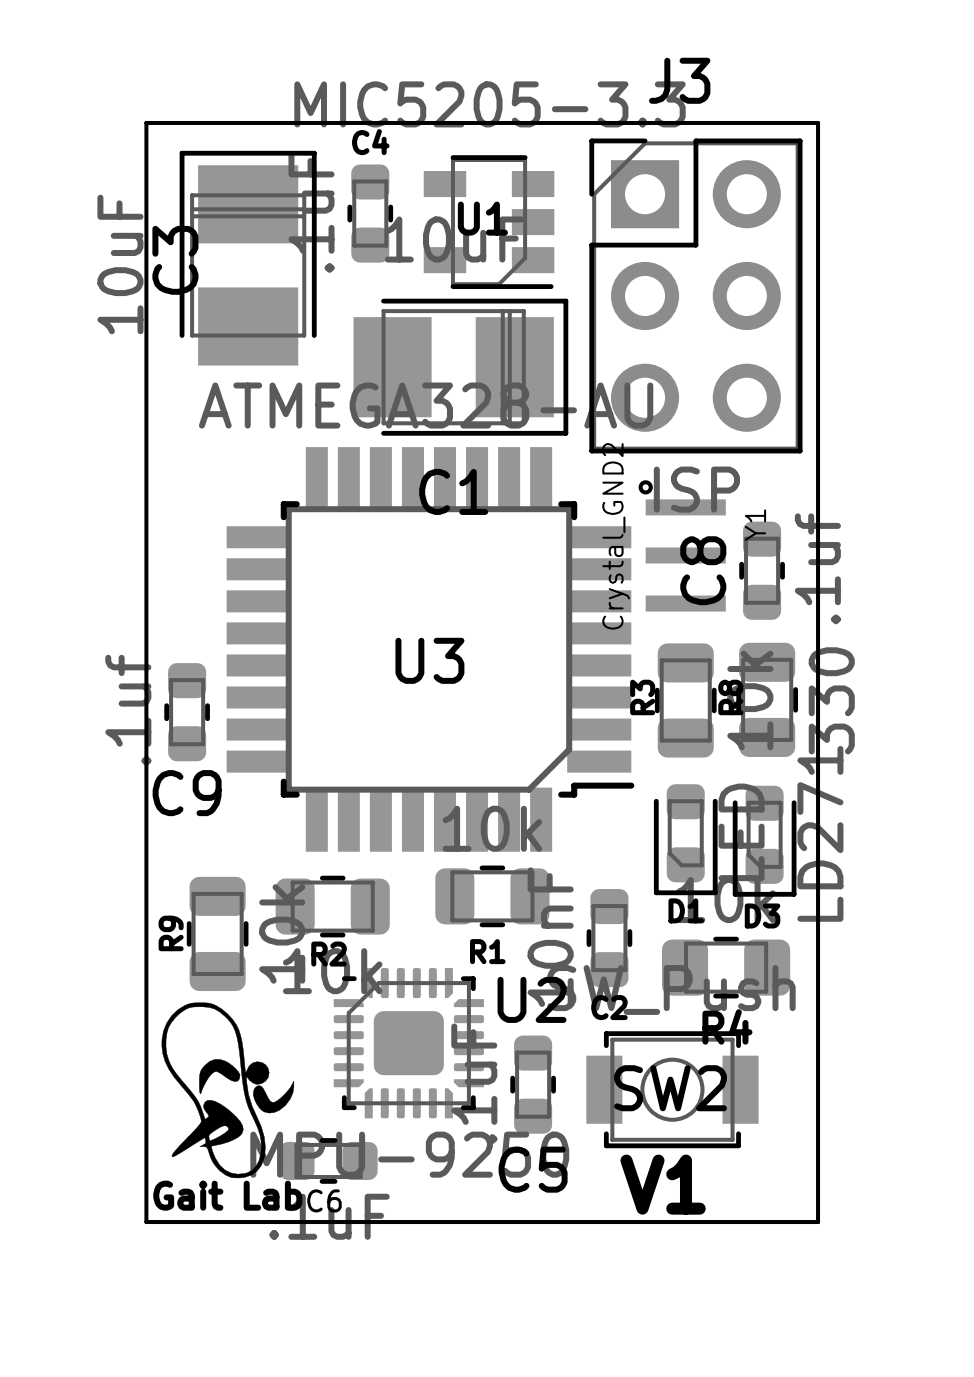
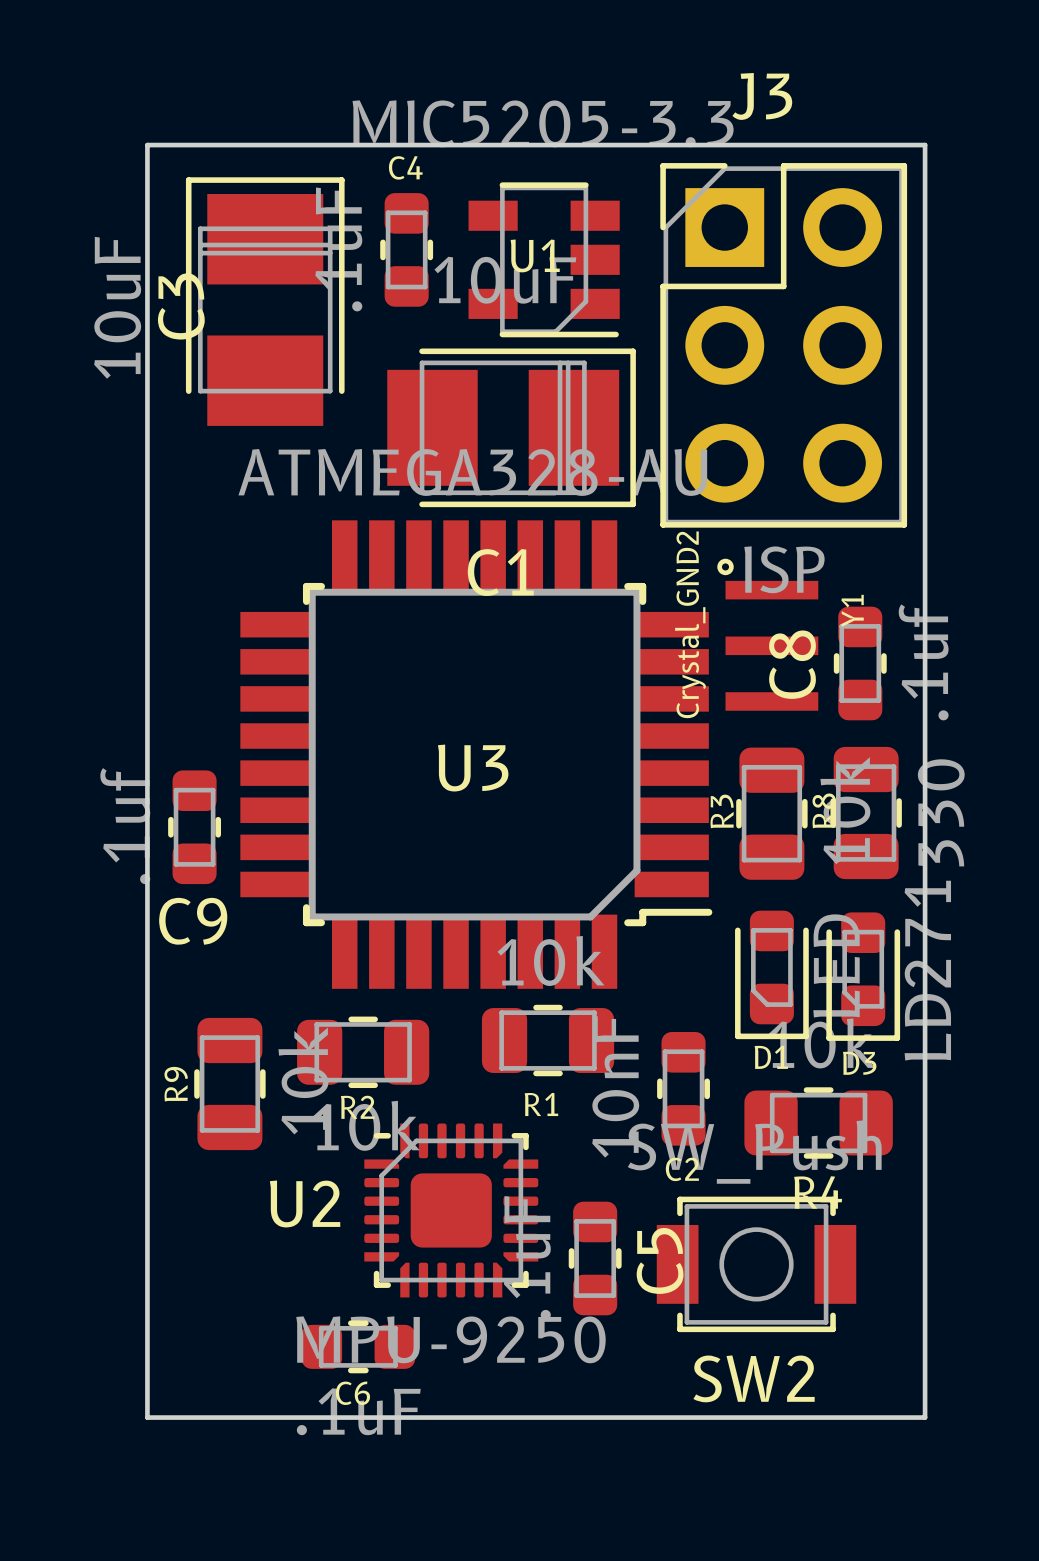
U2 name position: U2 (532, 999) -> U2 (305, 1203)
drawing: [161, 1002, 295, 1179] -> none
SW2 name position: SW2 (670, 1088) -> SW2 (754, 1378)
C5 name rotation: 0° (533, 1169) -> 90° counterclockwise (660, 1260)
C5 name position: C5 (533, 1169) -> C5 (660, 1260)
text: V1 (663, 1184) -> none
text: Gait Lab (227, 1195) -> none

